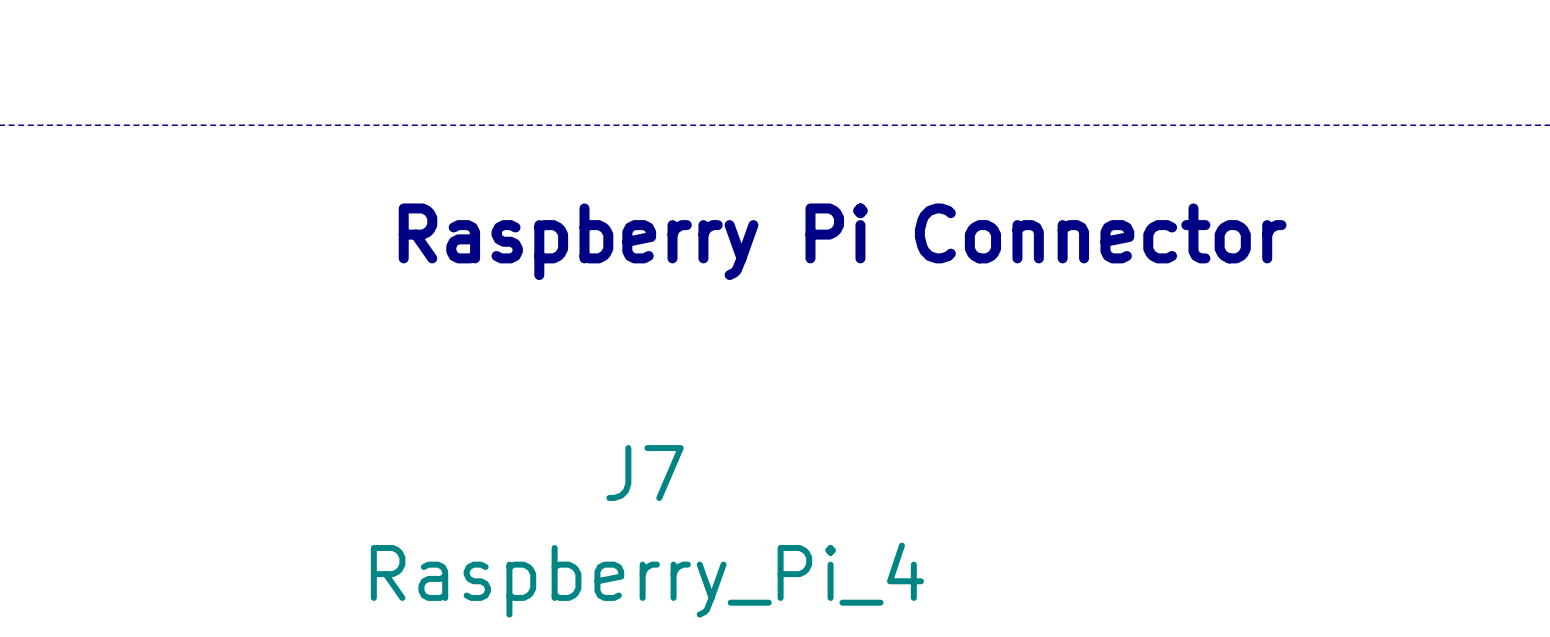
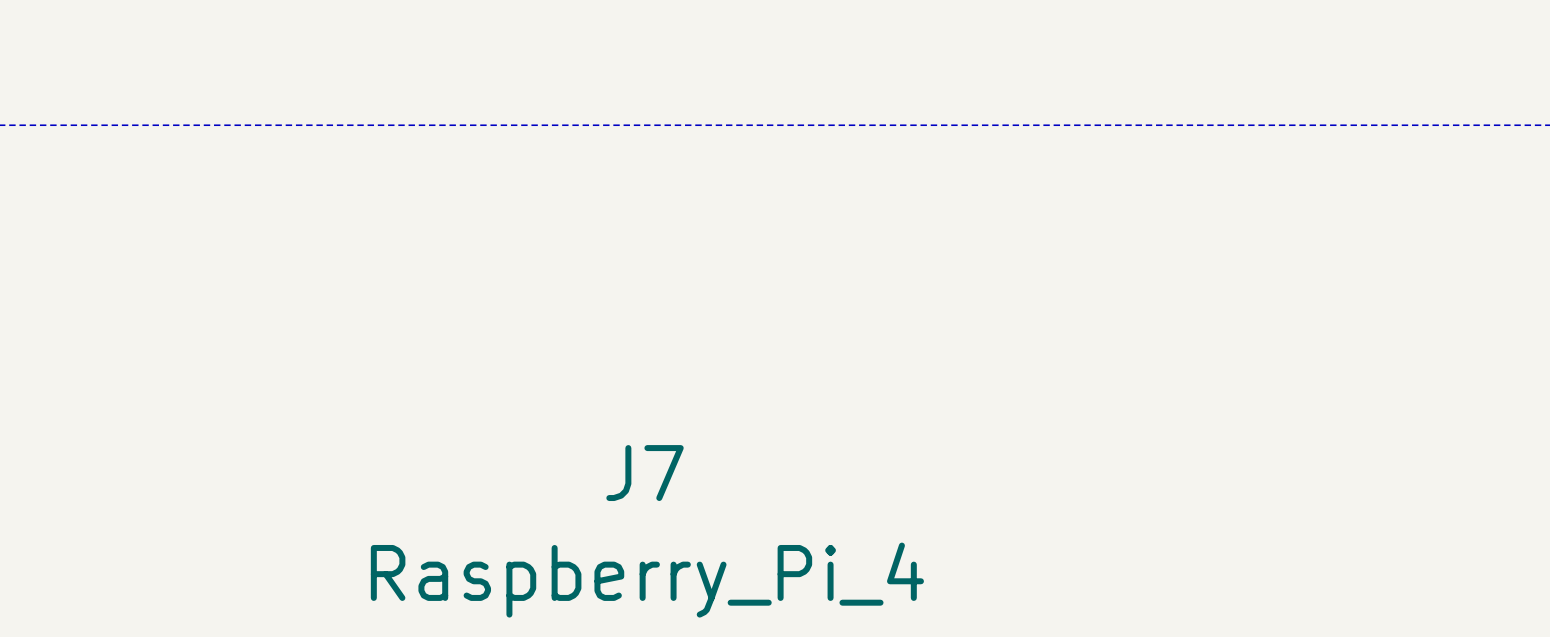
text: Raspberry Pi Connector (842, 241) -> none

